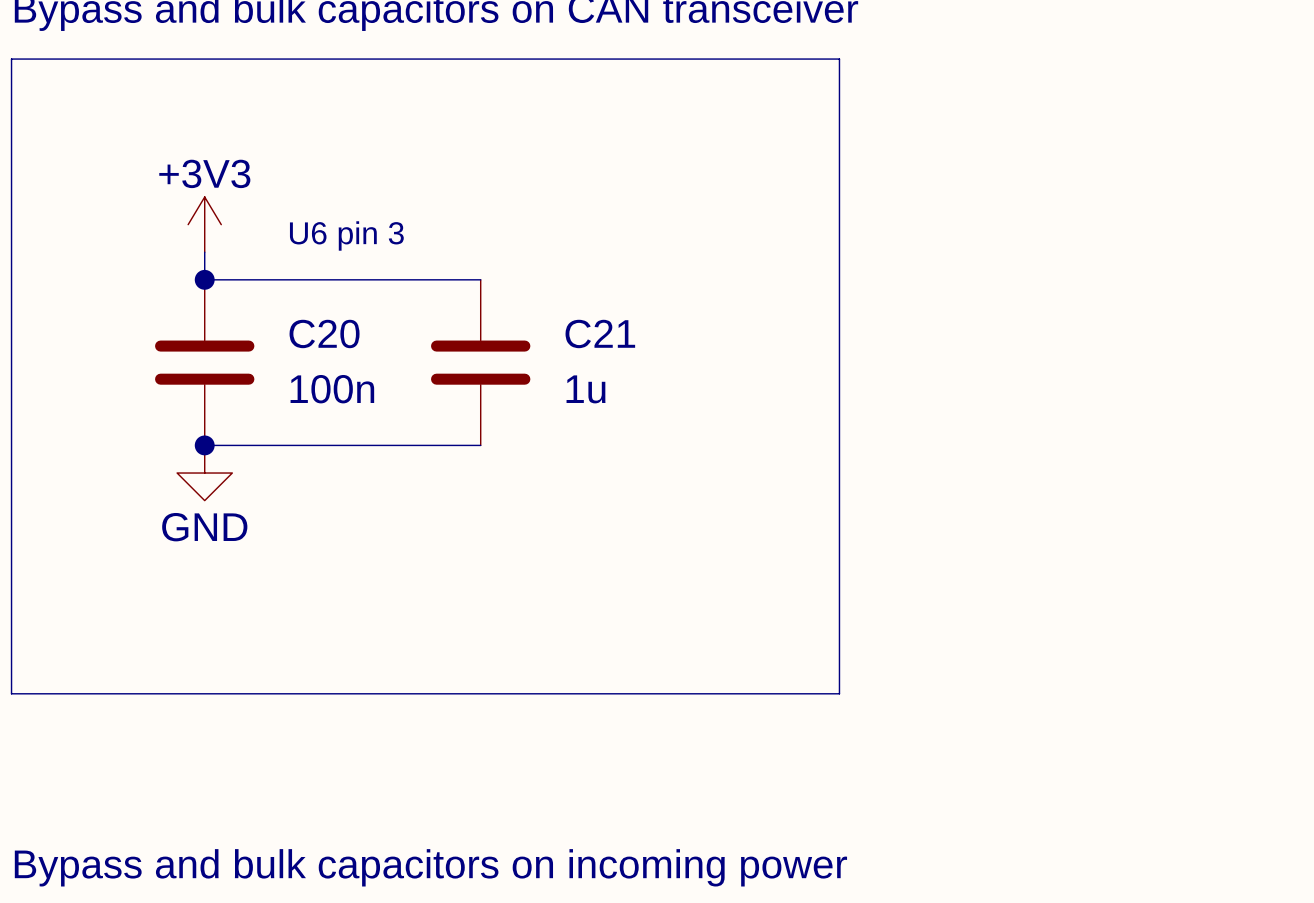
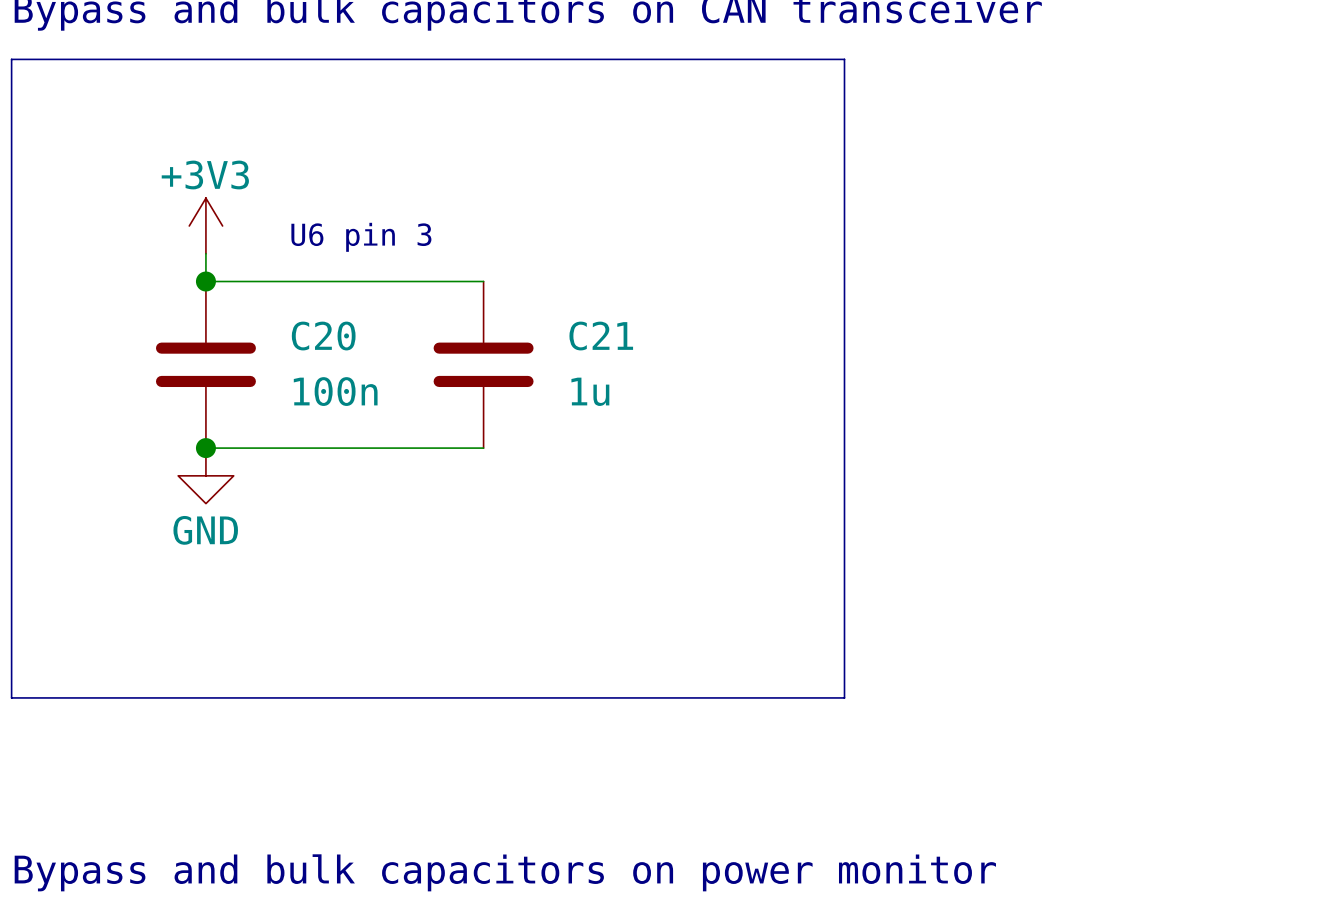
text: Bypass and bulk capacitors on incoming power (430, 867) -> Bypass and bulk capacitors on power monitor (505, 872)

